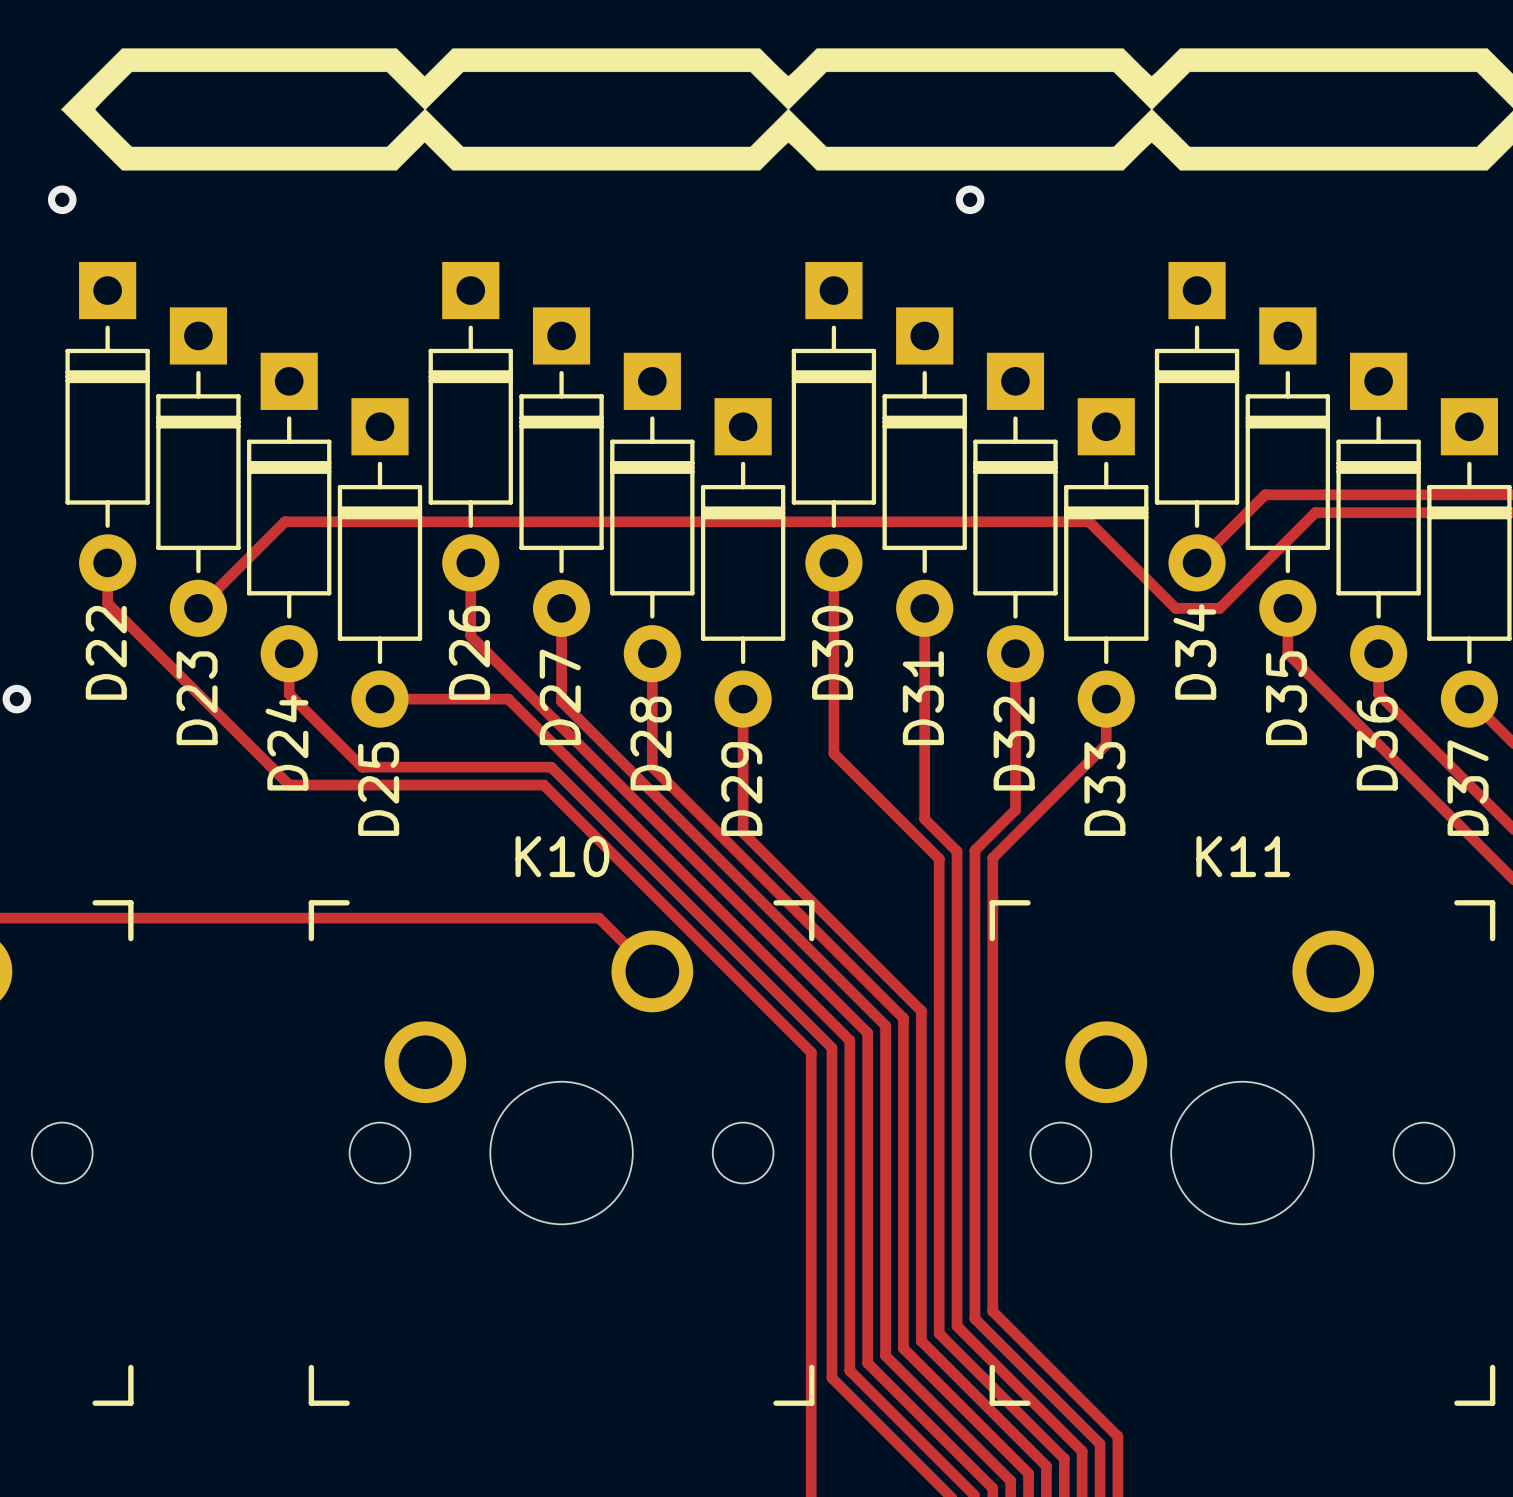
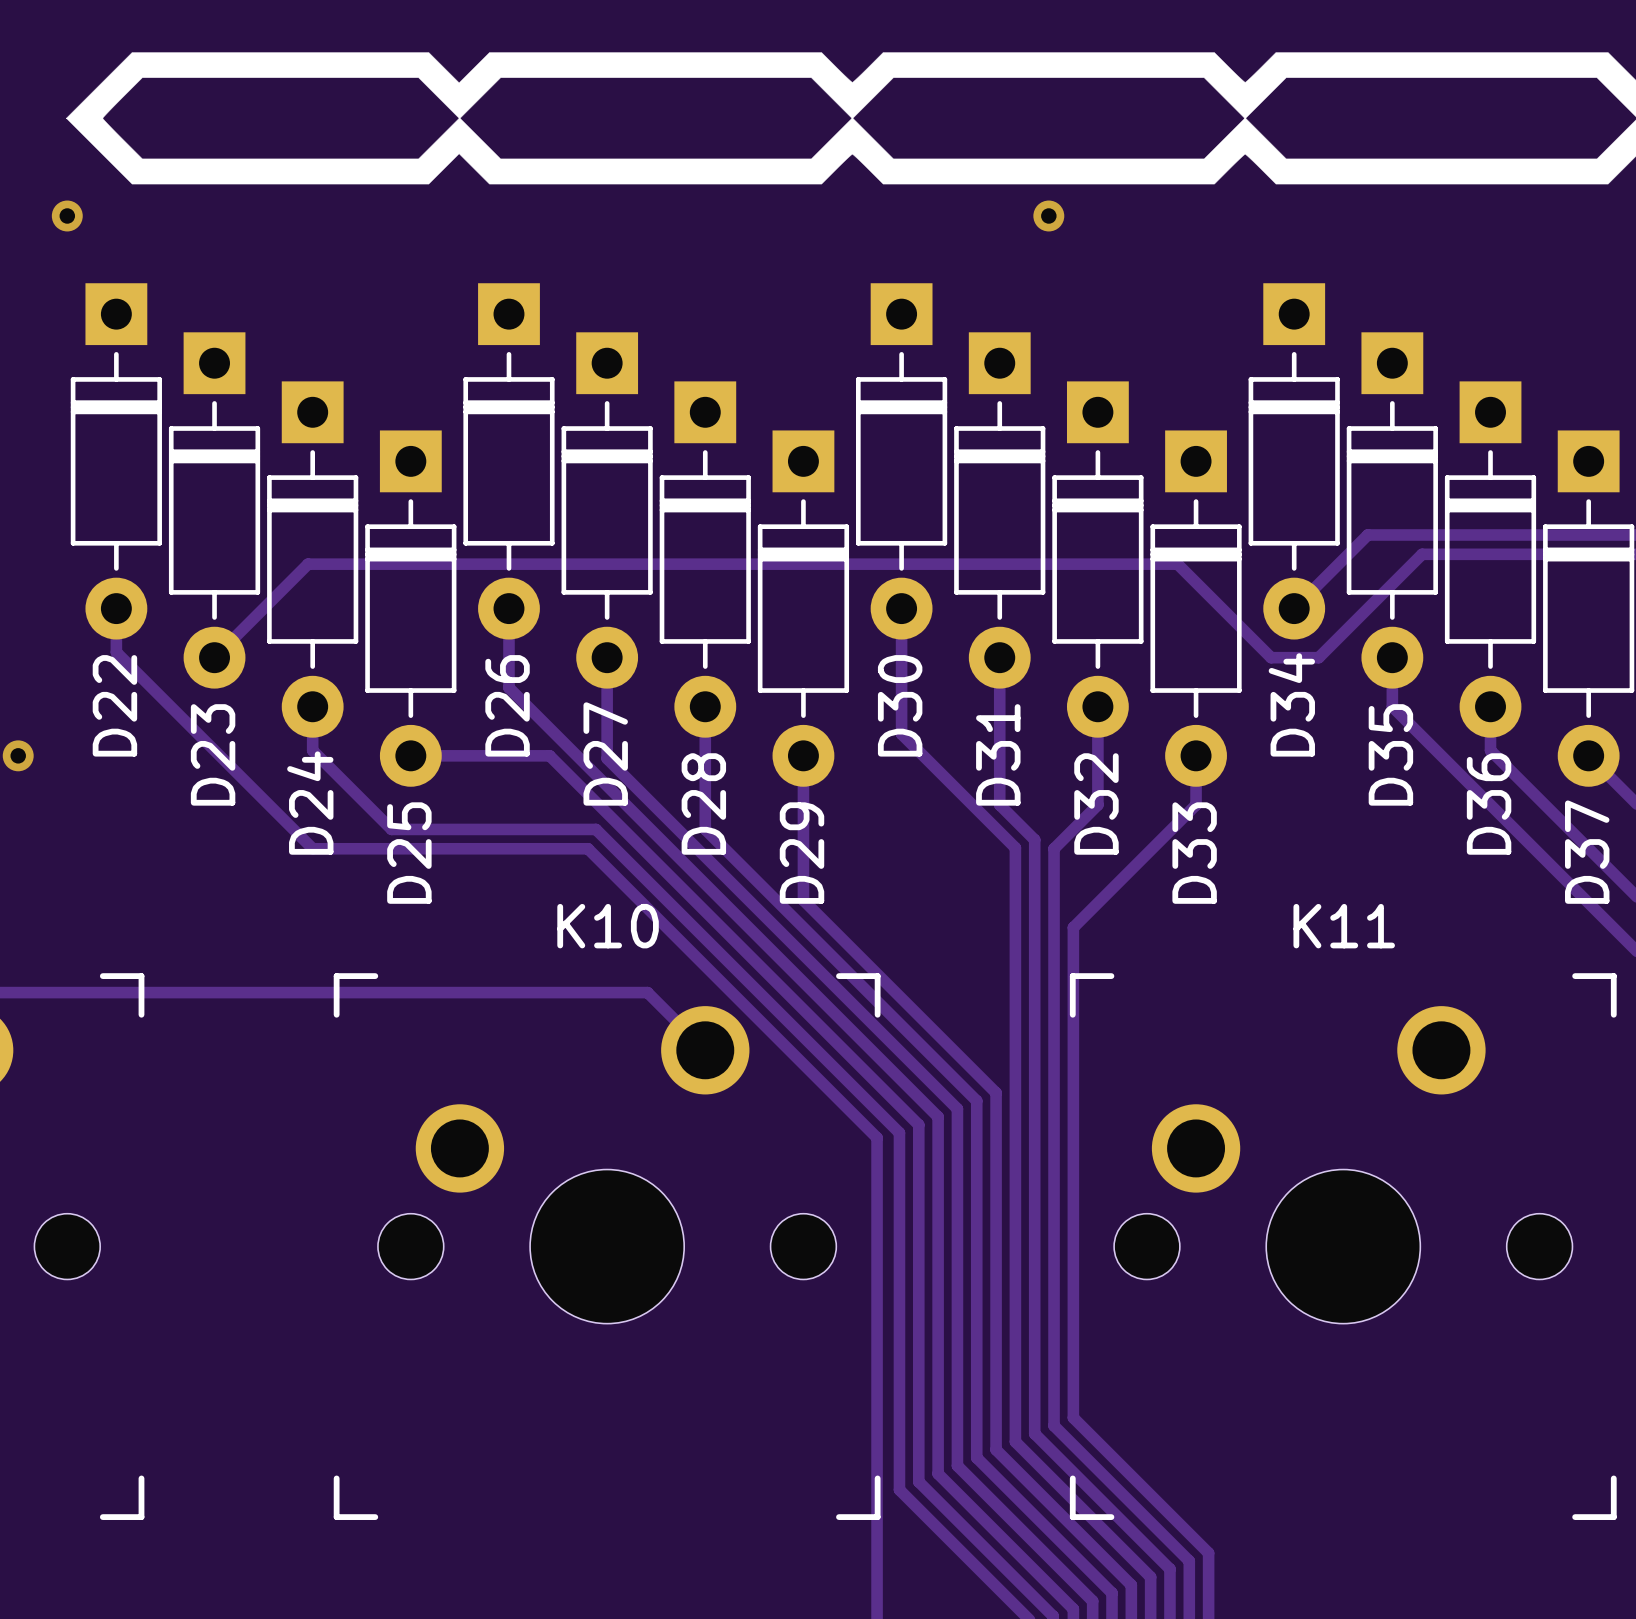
track: (833, 678) (833, 753) (939, 858) -> (901, 734) (1015, 847) (1015, 928)
track: (924, 744) (924, 819) (957, 851) -> (999, 804) (1034, 839) (1034, 920)
track: (1015, 744) (1015, 809) (974, 850) -> (1097, 804) (1054, 848) (1054, 919)

